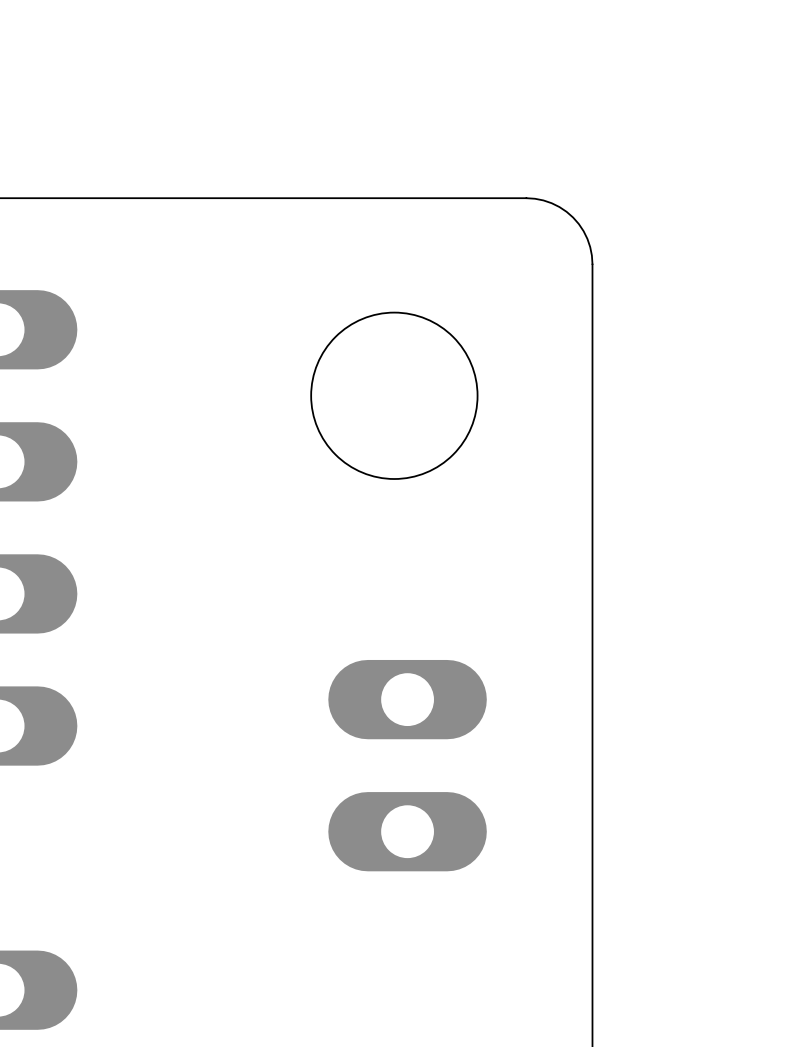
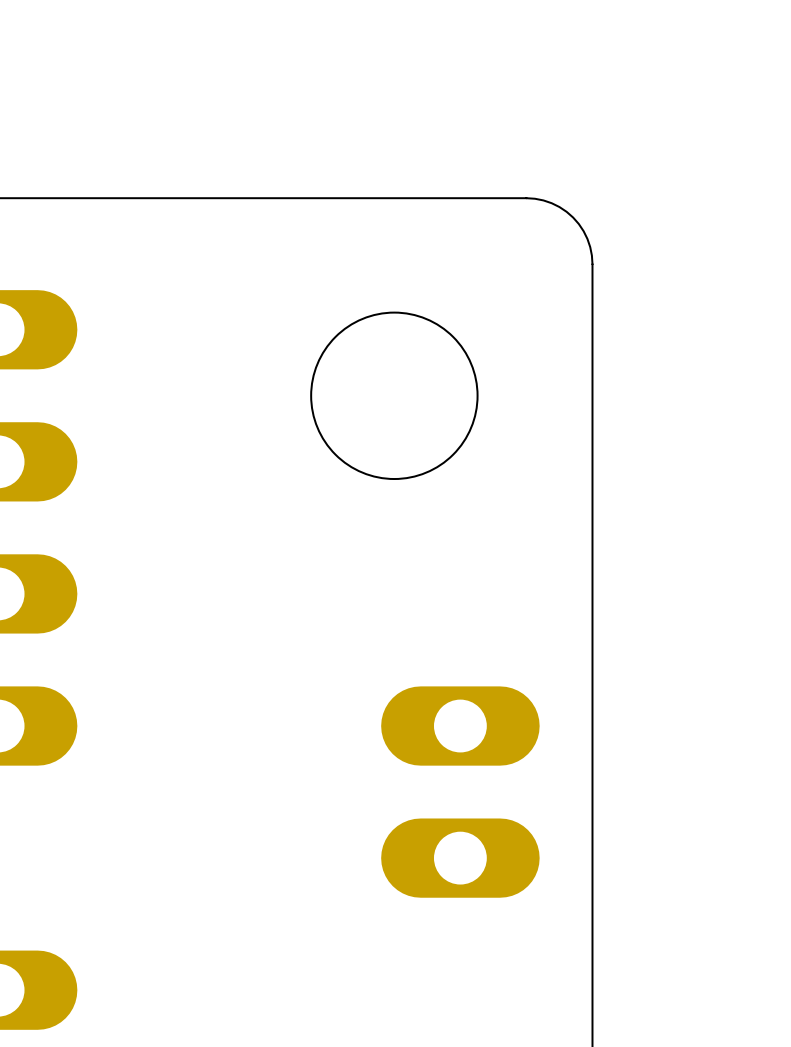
part position: (407, 765) -> (460, 792)

